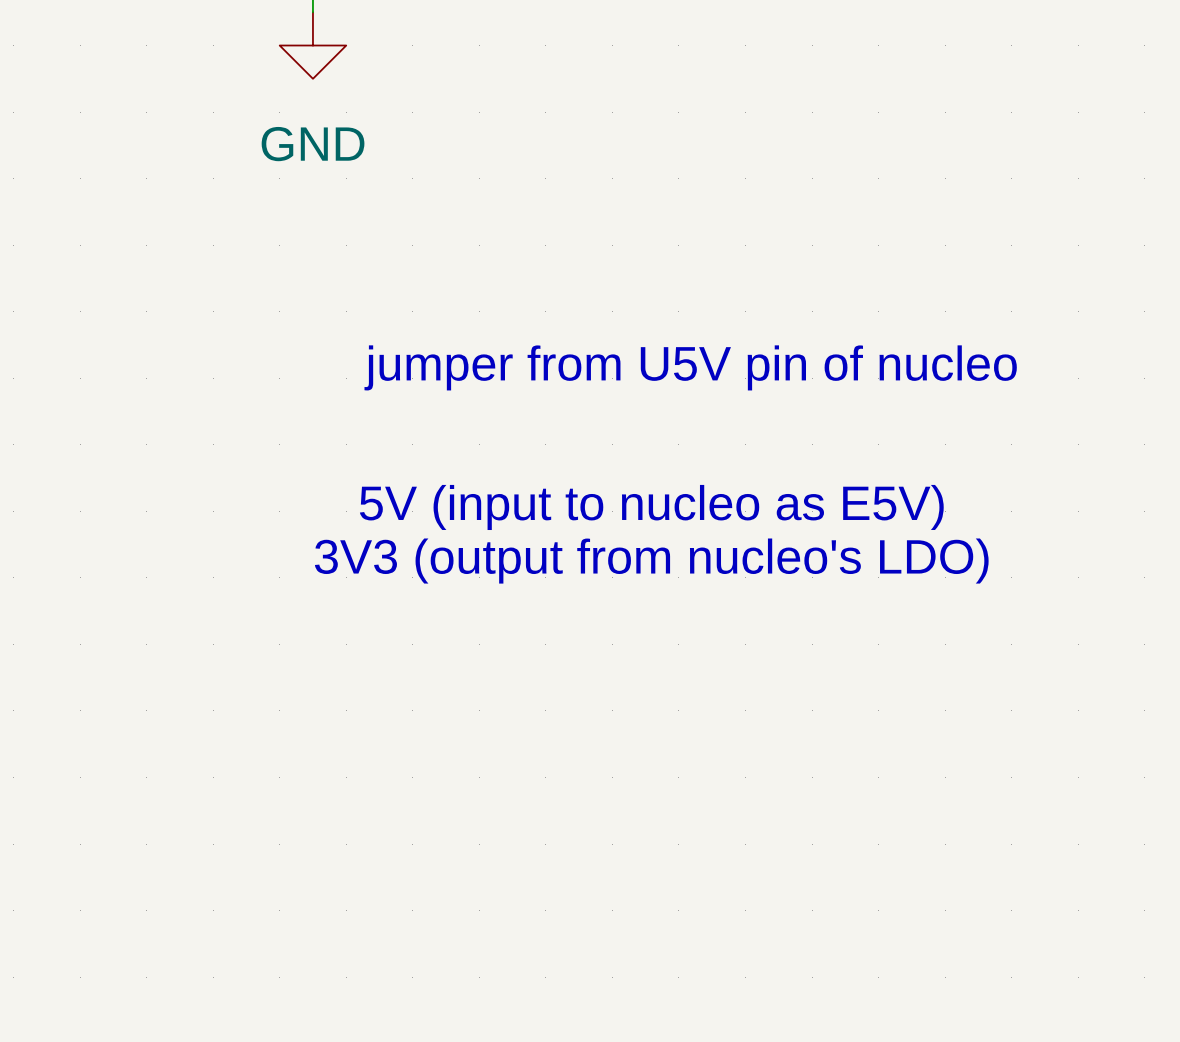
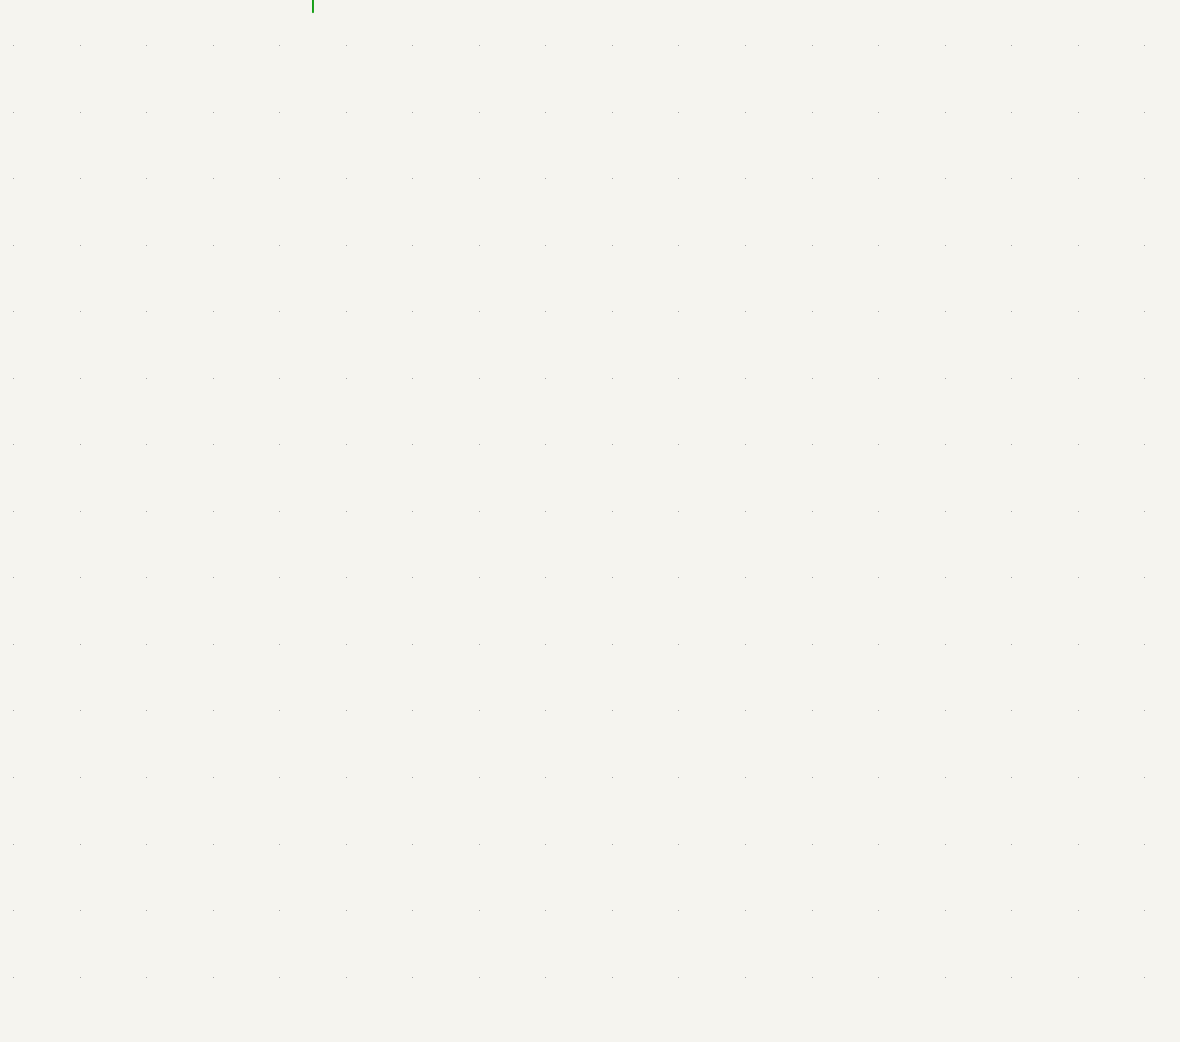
power symbol: GND (312, 45) -> none
text: jumper from U5V pin of nucleo (690, 367) -> none
text: 5V (input to nucleo as E5V) (651, 507) -> none
text: 3V3 (output from nucleo's LDO) (651, 561) -> none

